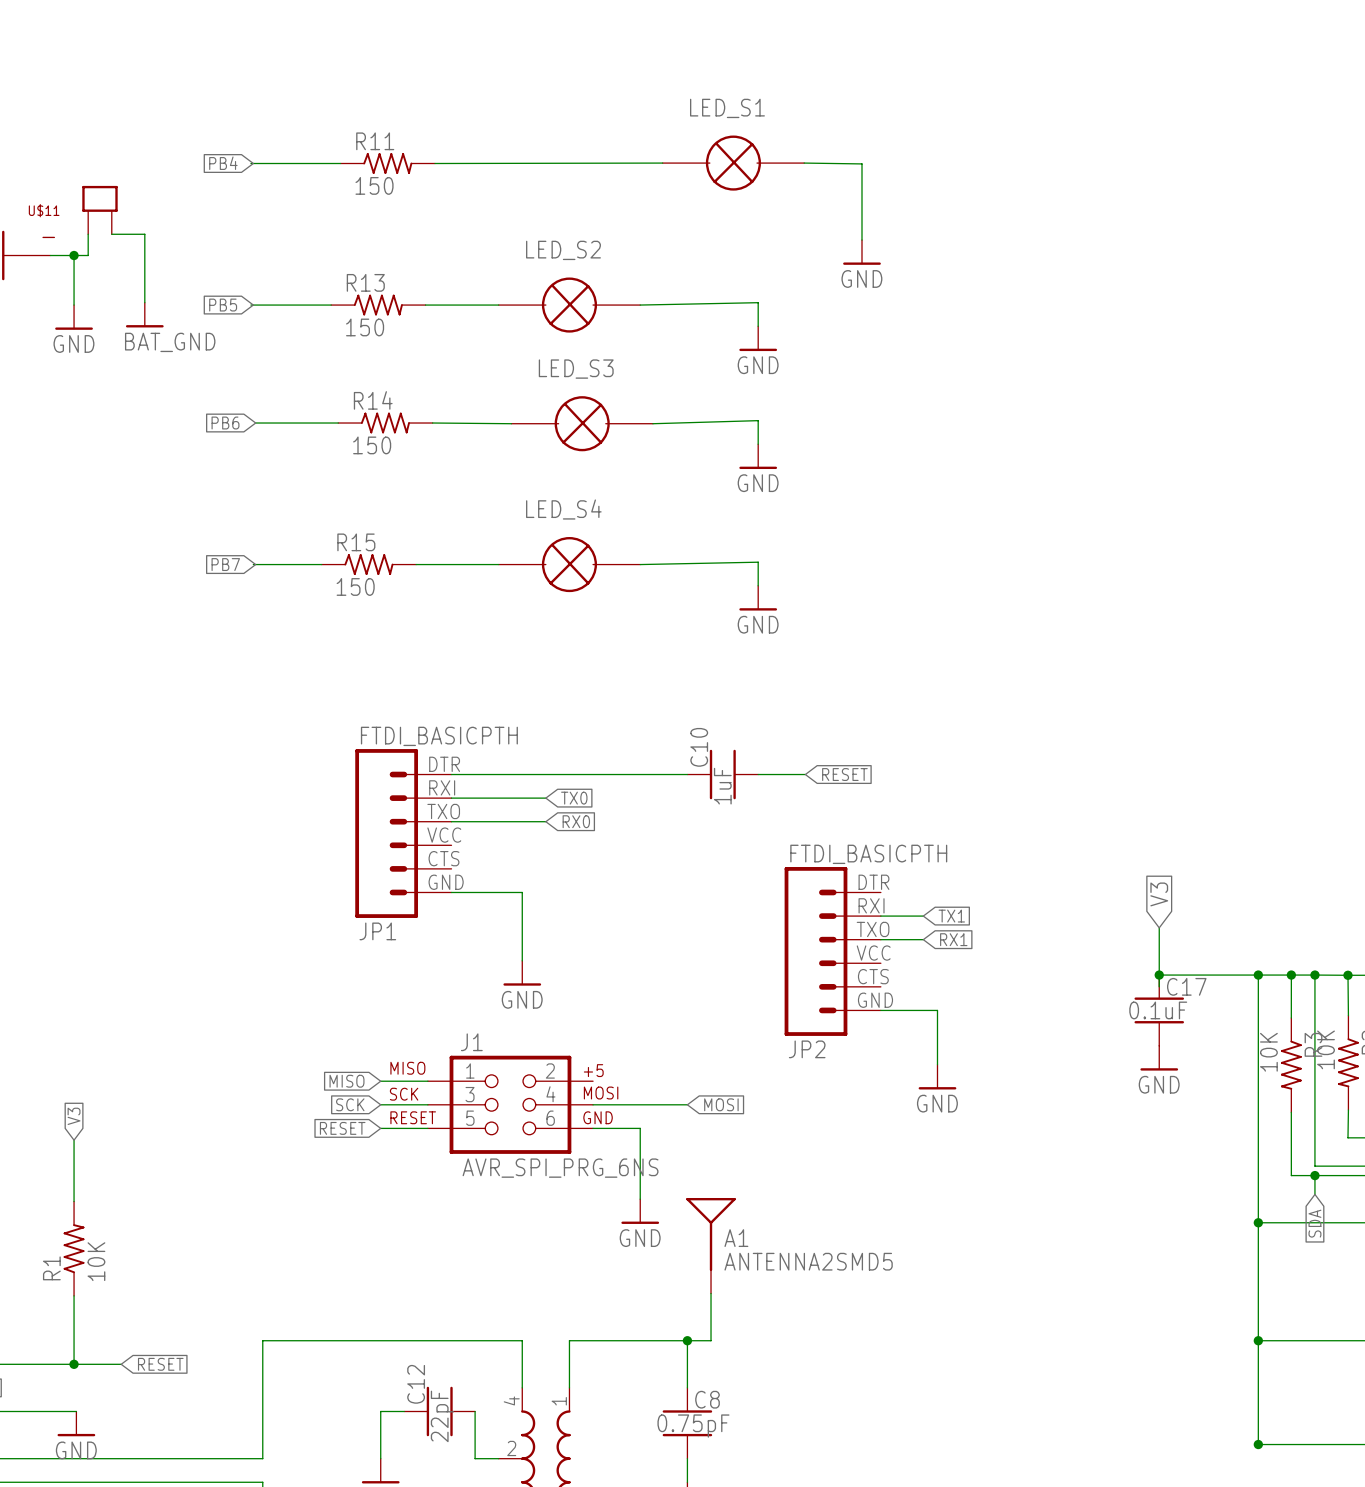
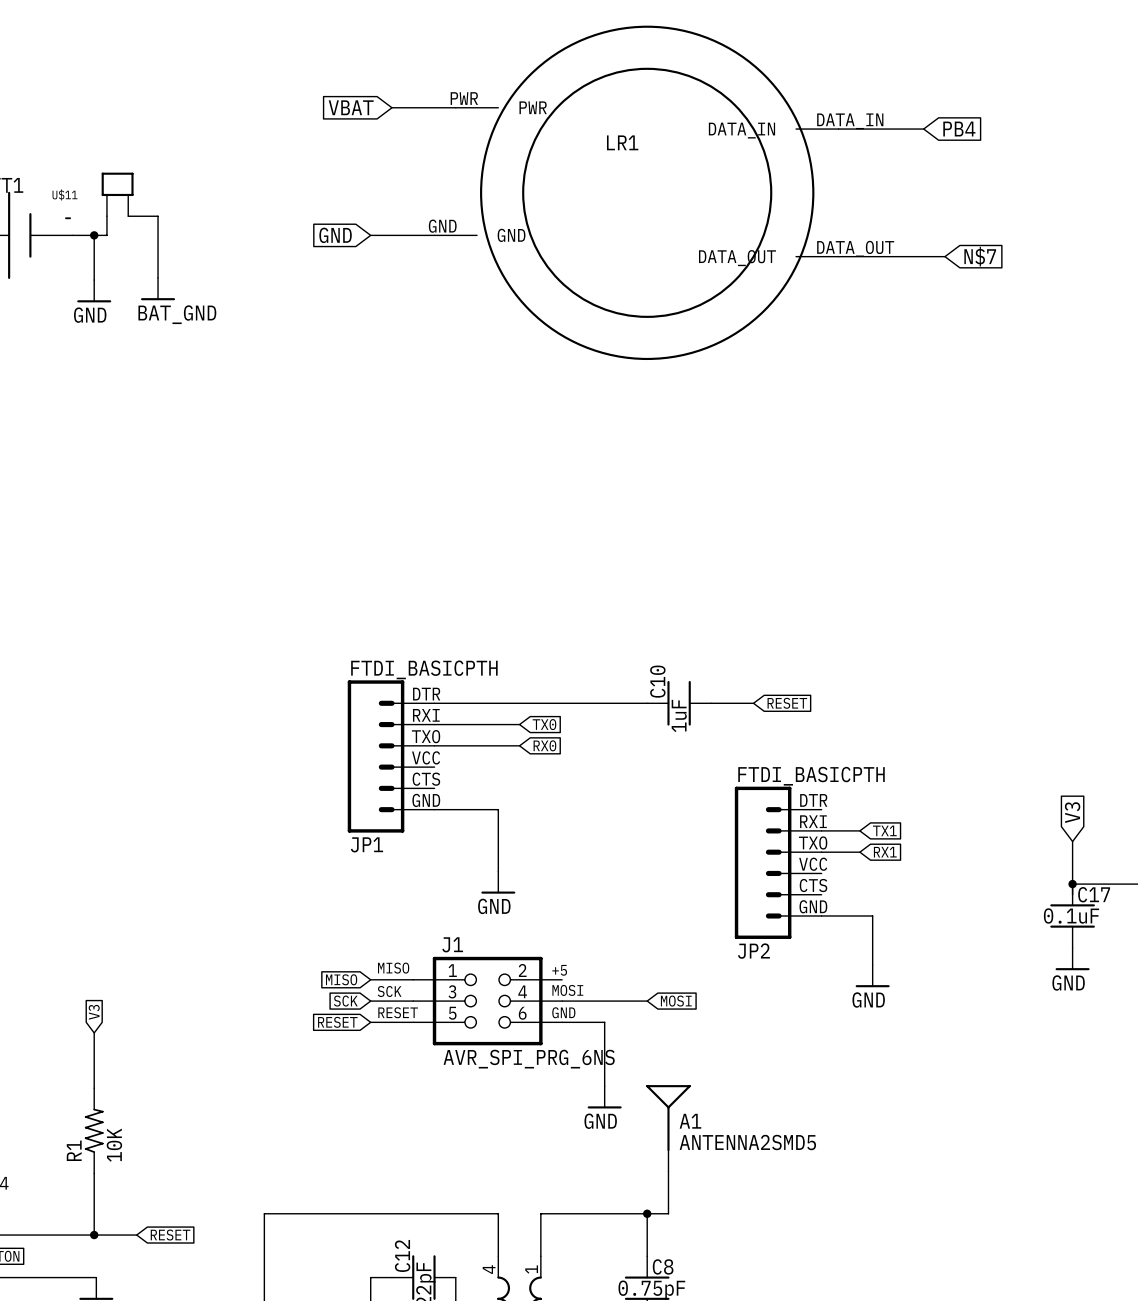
global label: none -> VBAT (351, 107)
wire: none -> (391, 107) (455, 107)
wire: none -> (838, 129) (923, 129)
global label: none -> PB4 (959, 129)
global label: PB4 (223, 163) -> none
wire: (250, 163) (340, 163) -> none
R11: 150 (387, 163) -> none
wire: (662, 163) (434, 163) -> none
LED_S1: (733, 163) -> none
wire: (804, 163) (861, 163) (861, 240) -> none
LR1: none -> (636, 192)
power symbol: GND (861, 252) -> none
global label: none -> GND (335, 235)
wire: none -> (370, 235) (434, 235)
wire: none -> (838, 256) (944, 256)
global label: none -> N$7 (980, 256)
global label: PB5 (223, 305) -> none
wire: (250, 305) (331, 305) -> none
R13: 150 (378, 305) -> none
wire: (425, 305) (498, 305) -> none
LED_S2: (569, 305) -> none
wire: (640, 305) (758, 302) (758, 326) -> none
power symbol: GND (758, 338) -> none
global label: PB6 (225, 423) -> none
wire: (255, 423) (338, 423) -> none
R14: 150 (385, 423) -> none
wire: (432, 423) (511, 423) -> none
LED_S3: (582, 423) -> none
wire: (652, 423) (758, 420) (758, 444) -> none
power symbol: GND (758, 456) -> none
global label: PB7 (225, 564) -> none
wire: (253, 564) (321, 564) -> none
R15: 150 (368, 564) -> none
wire: (416, 564) (498, 564) -> none
LED_S4: (569, 564) -> none
wire: (640, 564) (758, 562) (758, 585) -> none
power symbol: GND (758, 598) -> none

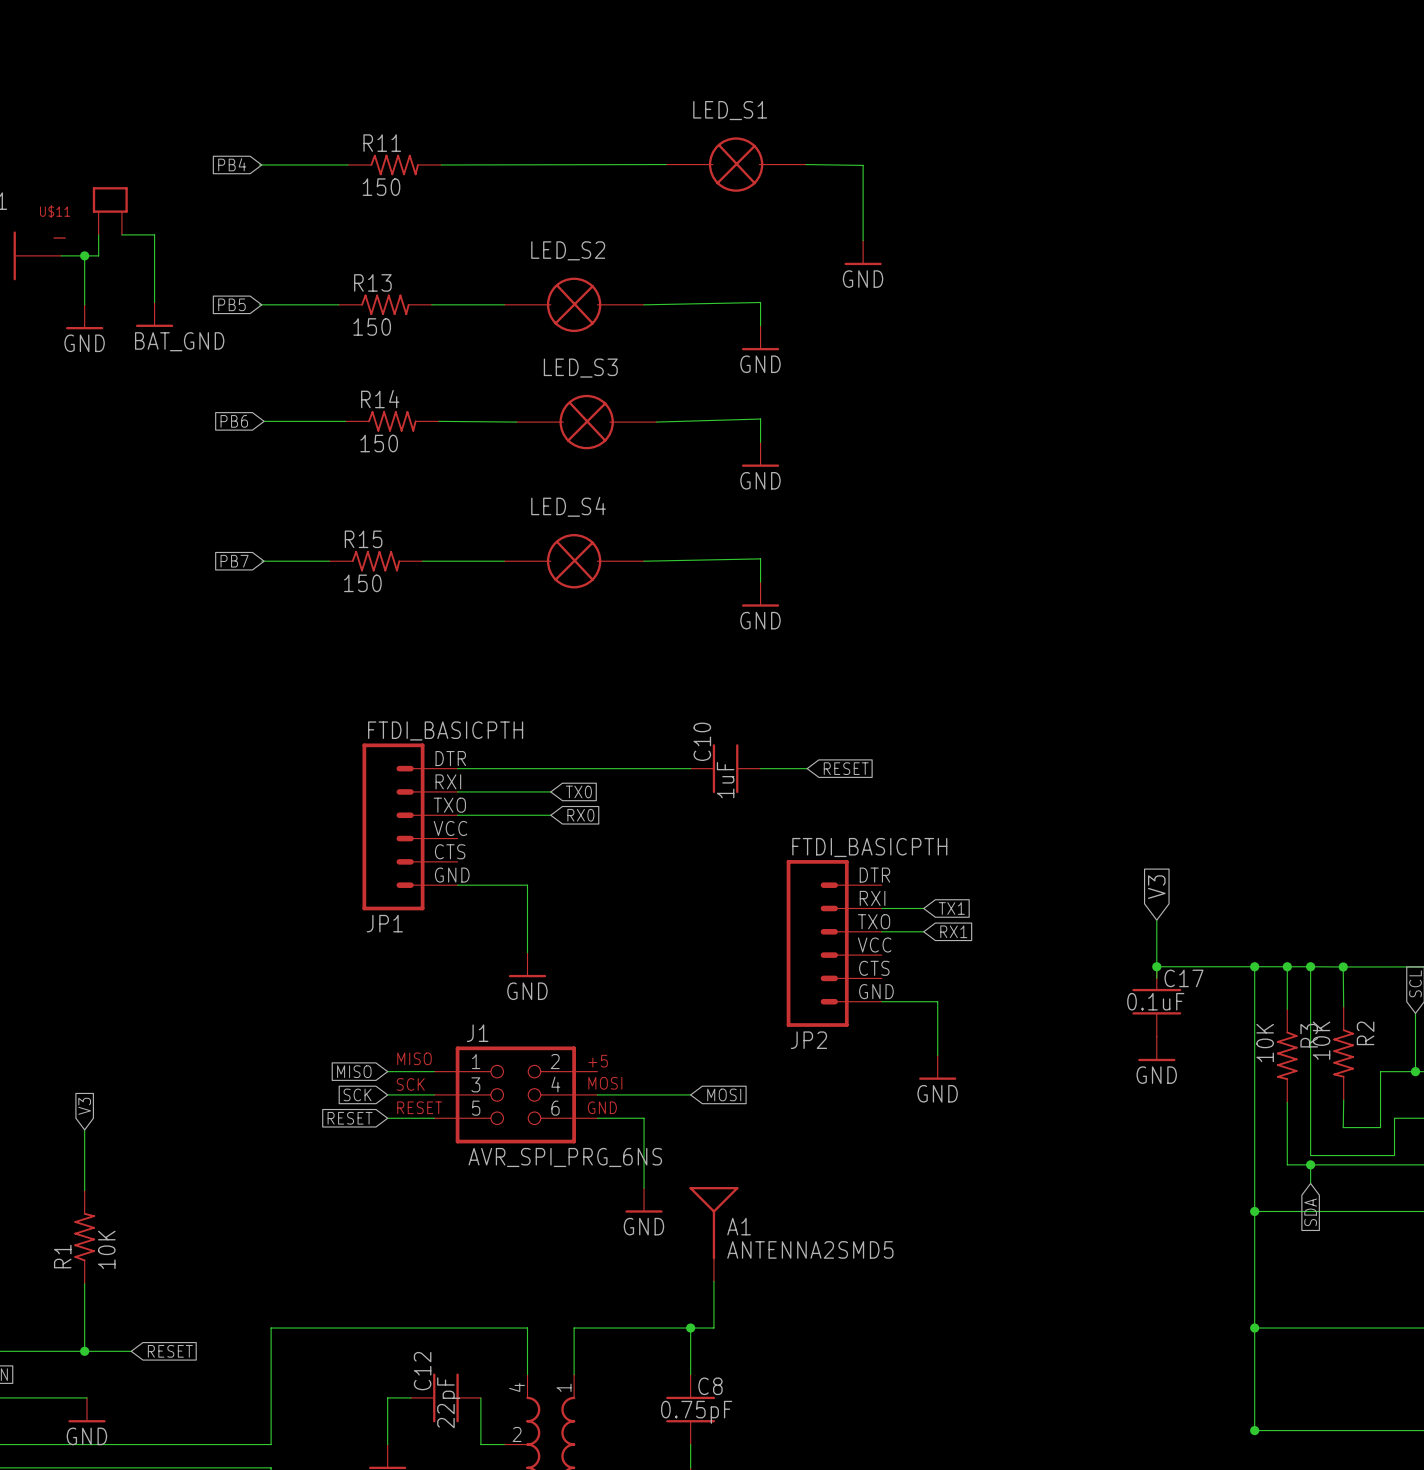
global label: VBAT (351, 107) -> none
wire: (391, 107) (455, 107) -> none
wire: (838, 129) (923, 129) -> none
global label: PB4 (959, 129) -> none
global label: none -> PB4 (232, 164)
wire: none -> (259, 164) (348, 164)
R11: none -> 150 (394, 164)
wire: none -> (666, 164) (441, 164)
LED_S1: none -> (736, 164)
wire: none -> (806, 164) (863, 165) (863, 240)
LR1: (636, 192) -> none
power symbol: none -> GND (863, 252)
global label: GND (335, 235) -> none
wire: (370, 235) (434, 235) -> none
wire: (838, 256) (944, 256) -> none
global label: N$7 (980, 256) -> none
global label: none -> PB5 (231, 304)
wire: none -> (259, 304) (338, 304)
R13: none -> 150 (385, 304)
wire: none -> (431, 304) (504, 304)
LED_S2: none -> (574, 304)
wire: none -> (644, 304) (760, 302) (760, 325)
power symbol: none -> GND (760, 338)
global label: none -> PB6 (234, 421)
wire: none -> (264, 421) (345, 421)
R14: none -> 150 (392, 421)
wire: none -> (438, 421) (516, 422)
LED_S3: none -> (586, 422)
wire: none -> (656, 422) (760, 419) (760, 442)
power symbol: none -> GND (760, 454)
global label: none -> PB7 (234, 561)
wire: none -> (261, 561) (329, 561)
R15: none -> 150 (376, 561)
wire: none -> (422, 561) (504, 561)
LED_S4: none -> (574, 561)
wire: none -> (644, 561) (760, 558) (760, 582)
power symbol: none -> GND (760, 594)

